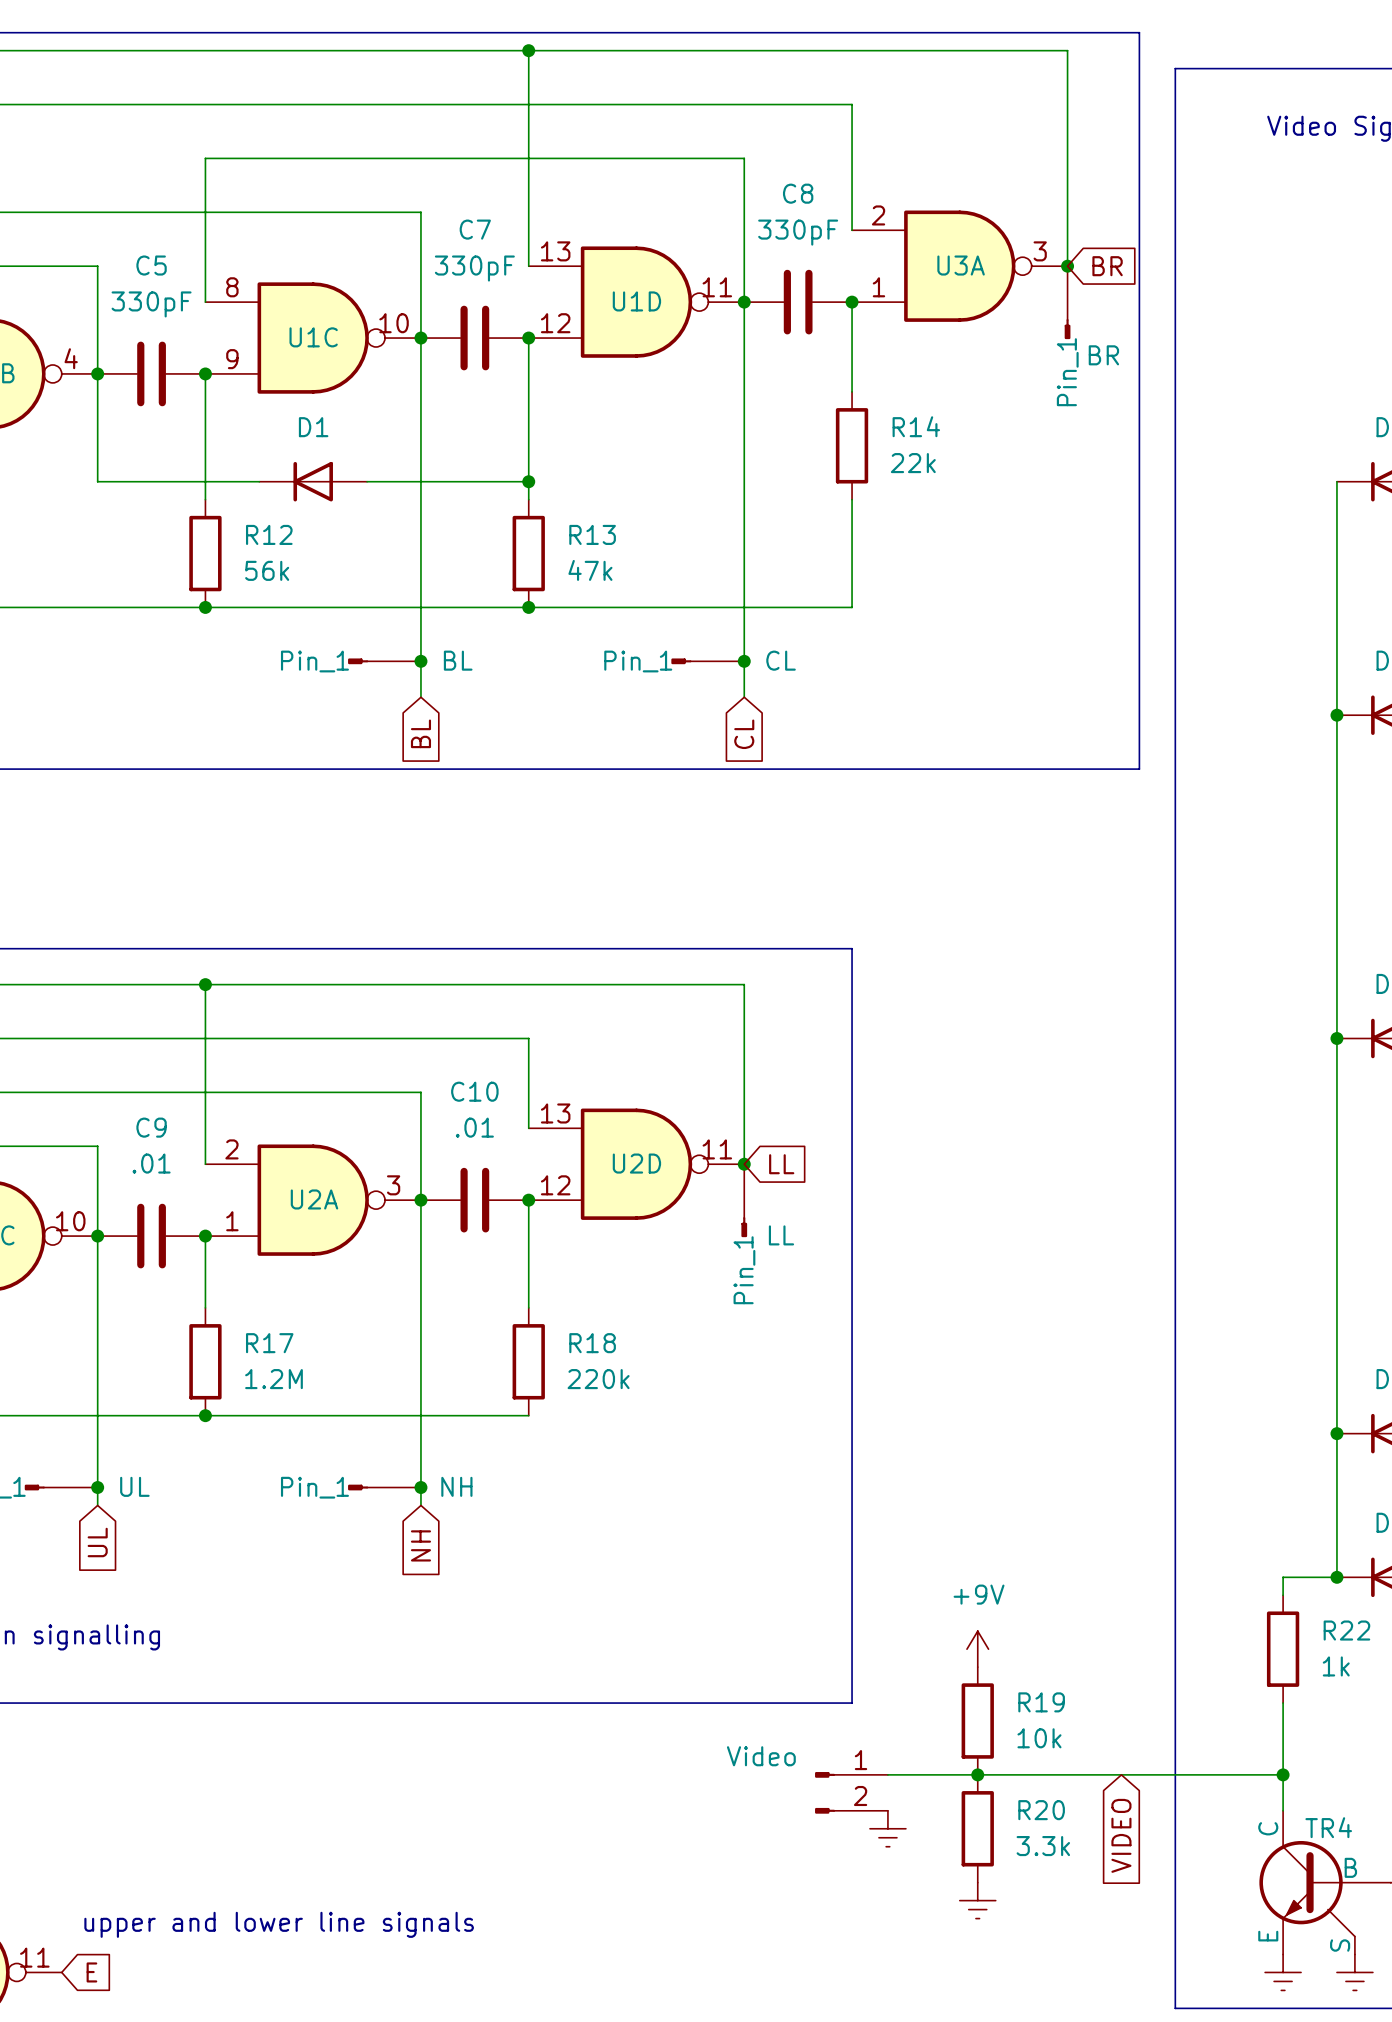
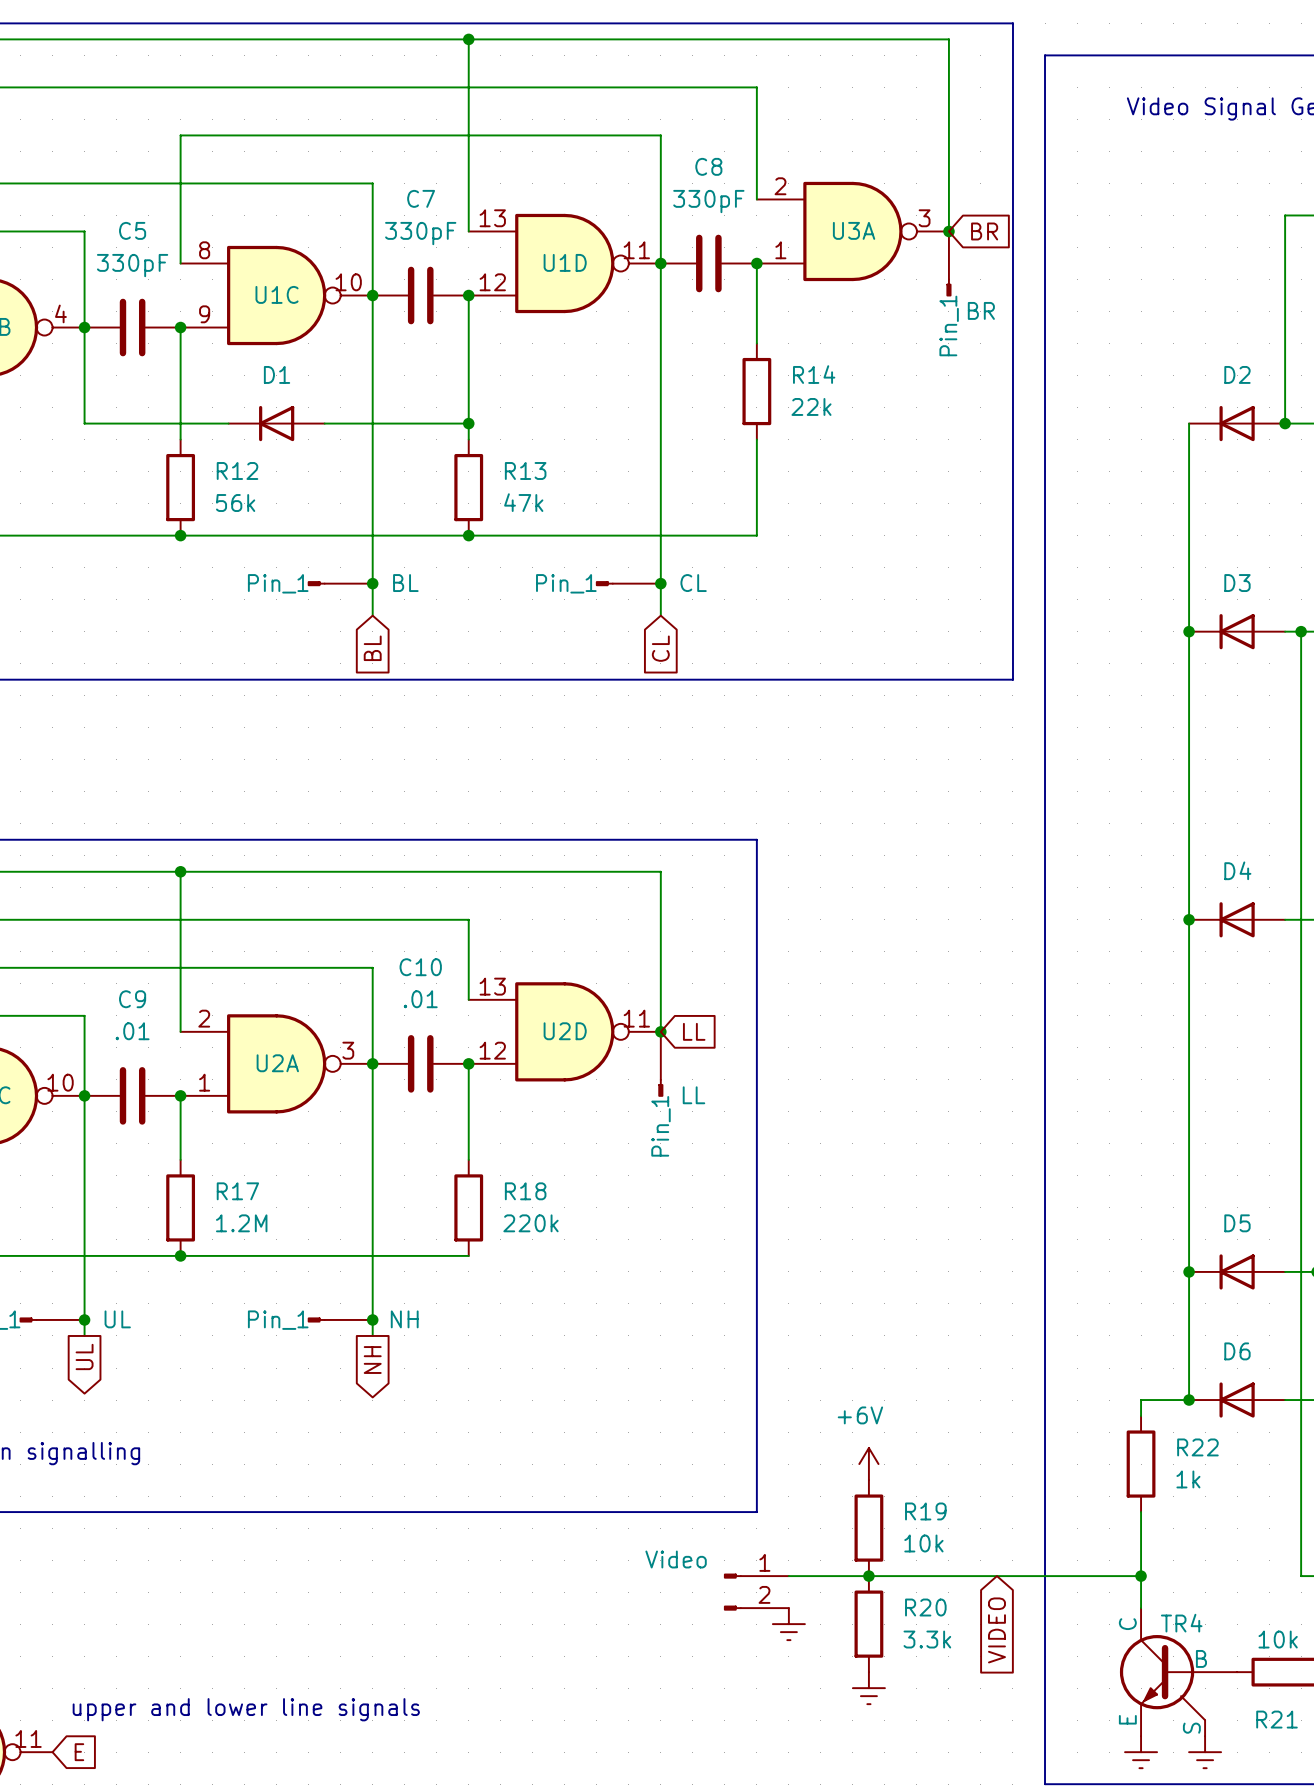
global label shape: input (97, 1542) -> output (84, 1356)
global label shape: input (420, 1545) -> output (372, 1360)
power symbol: +9V (977, 1649) -> +6V (868, 1464)

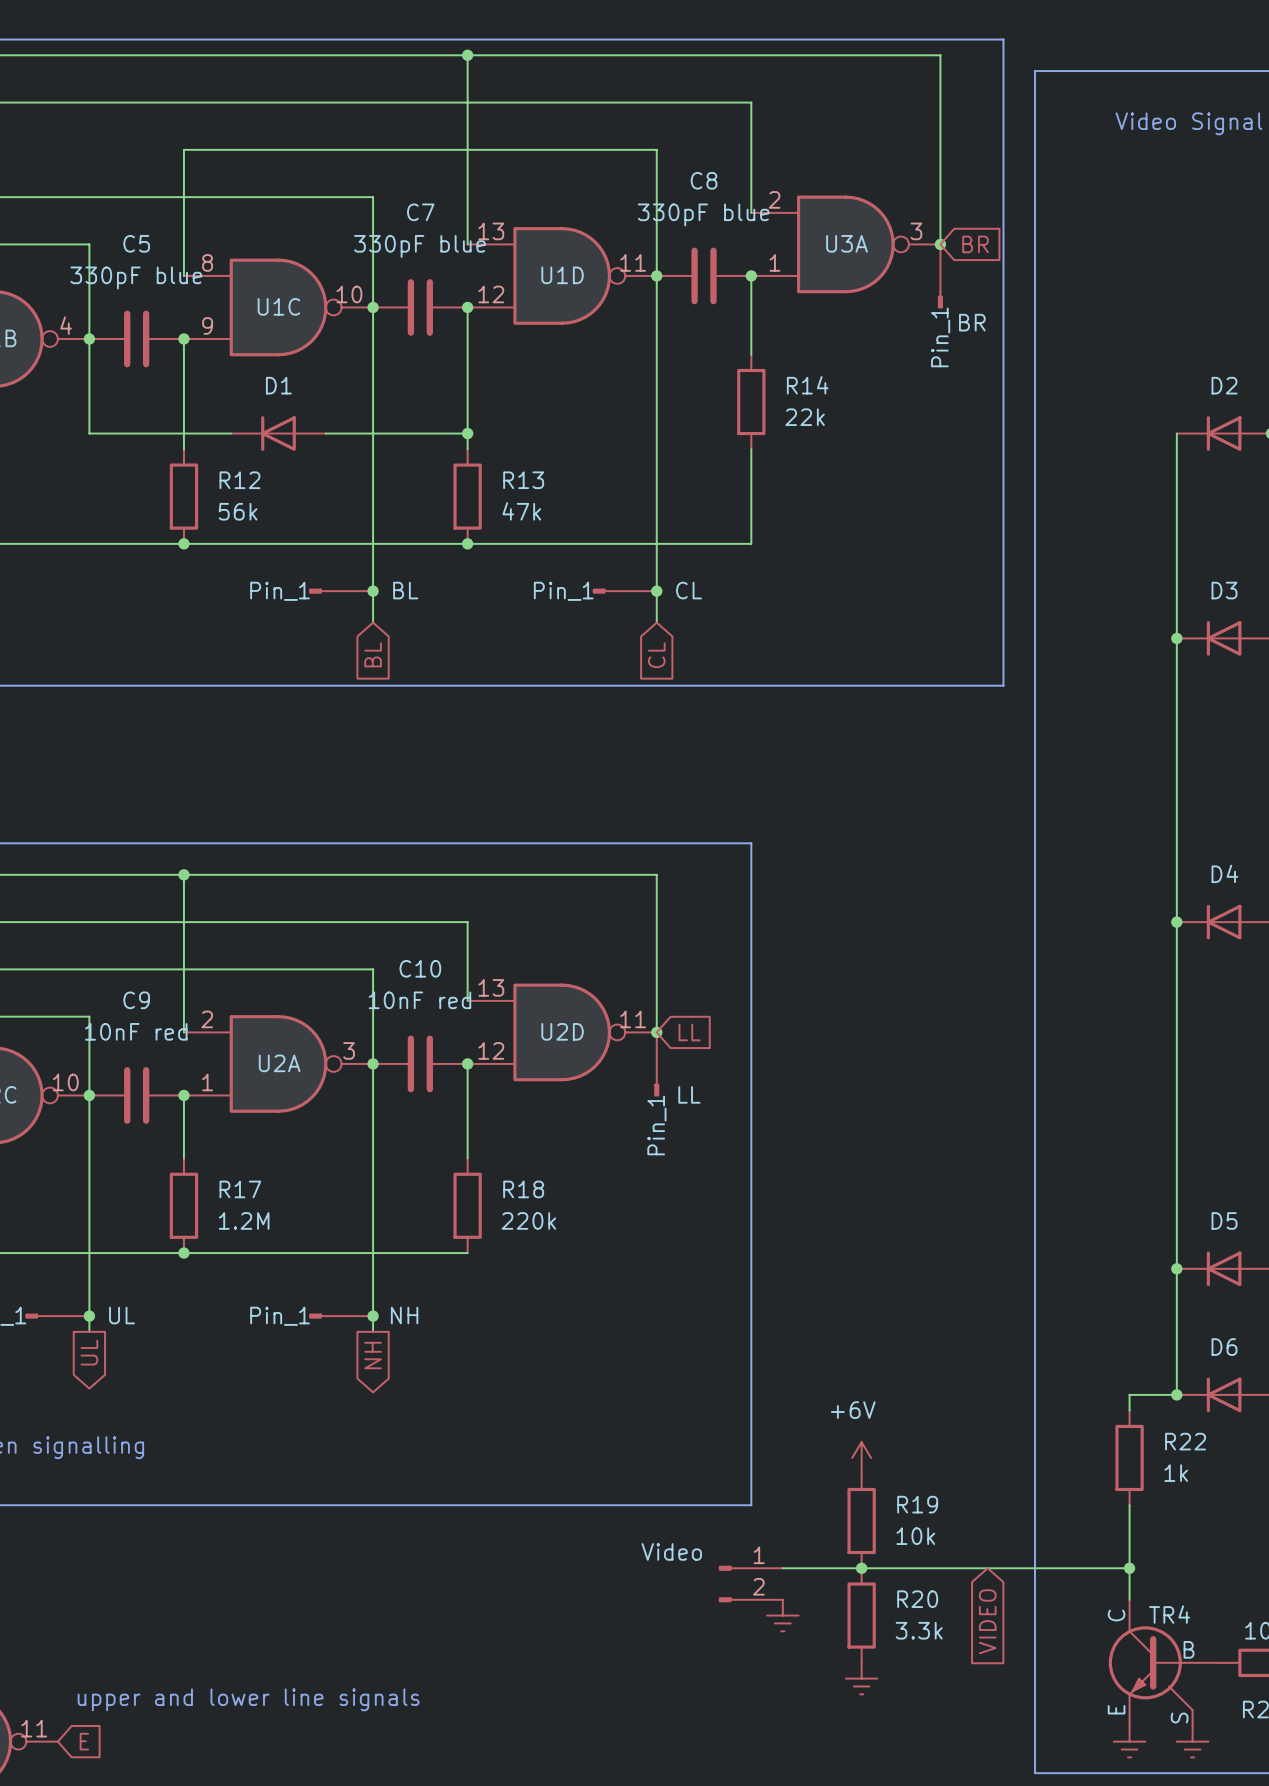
C8 value: 330pF (708, 201) -> 330pF blue (703, 214)
C7 value: 330pF (420, 233) -> 330pF blue (419, 246)
C5 value: 330pF (132, 265) -> 330pF blue (136, 277)
C10 value: .01 (420, 999) -> 10nF red (419, 1000)
C9 value: .01 (132, 1031) -> 10nF red (136, 1031)

